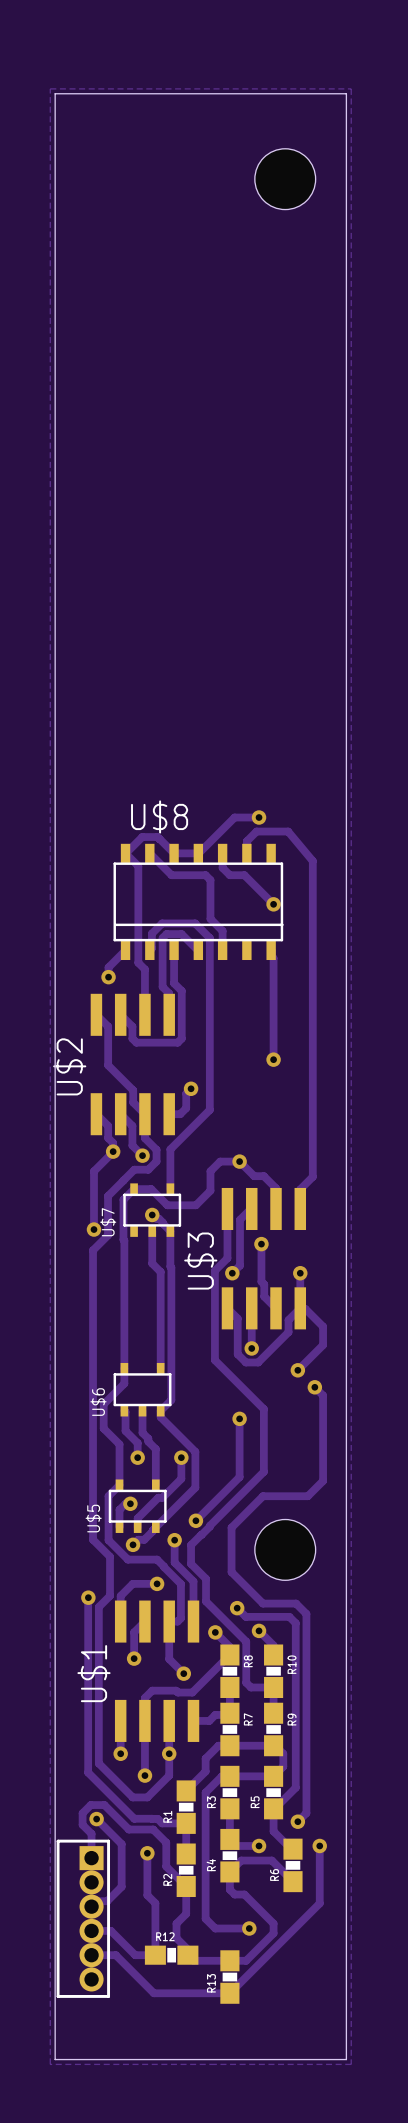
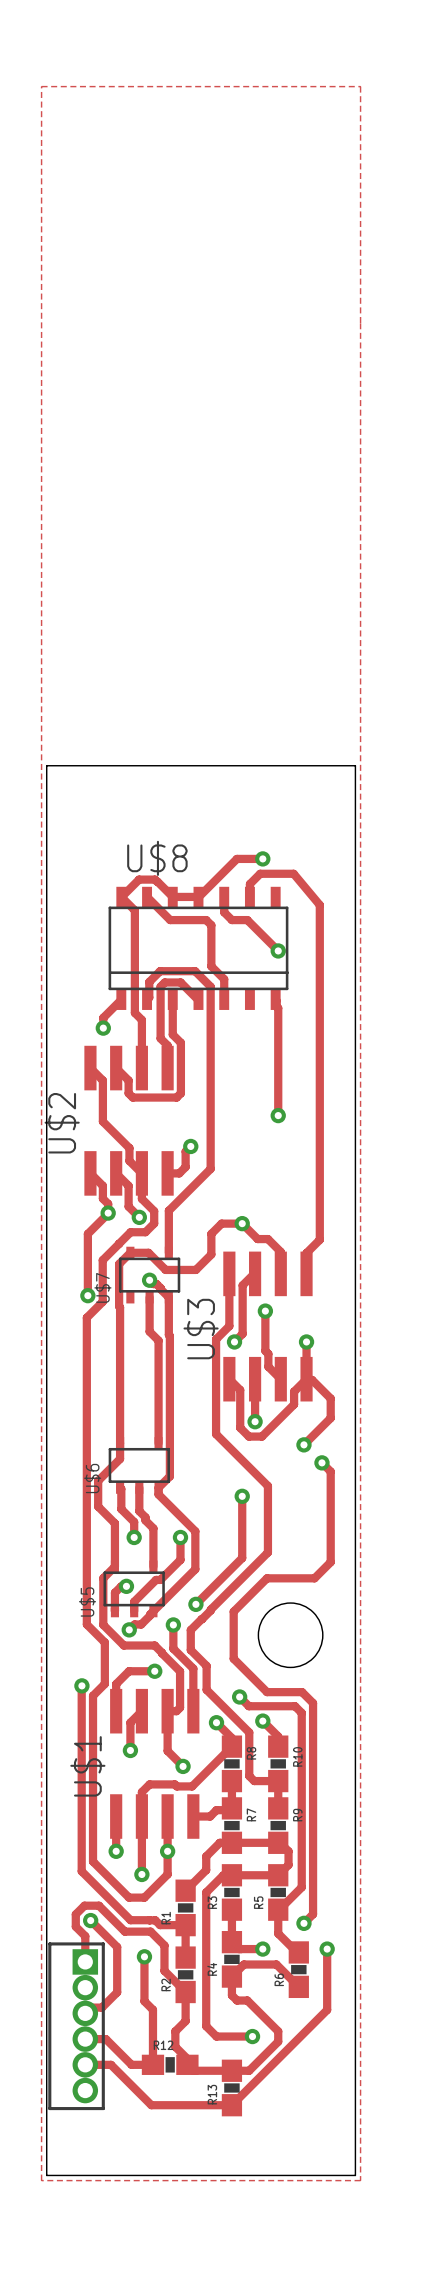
hole: (285, 179) -> none
board edge: (55, 729) (55, 93) (346, 93) (346, 729) -> (46, 765) (355, 765)

